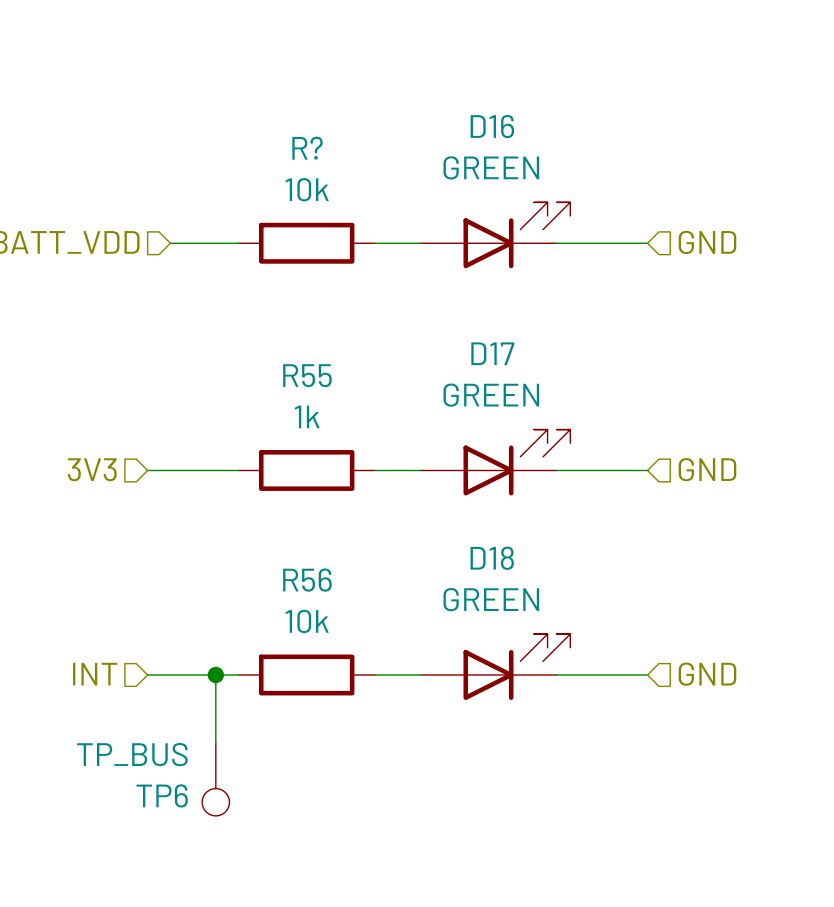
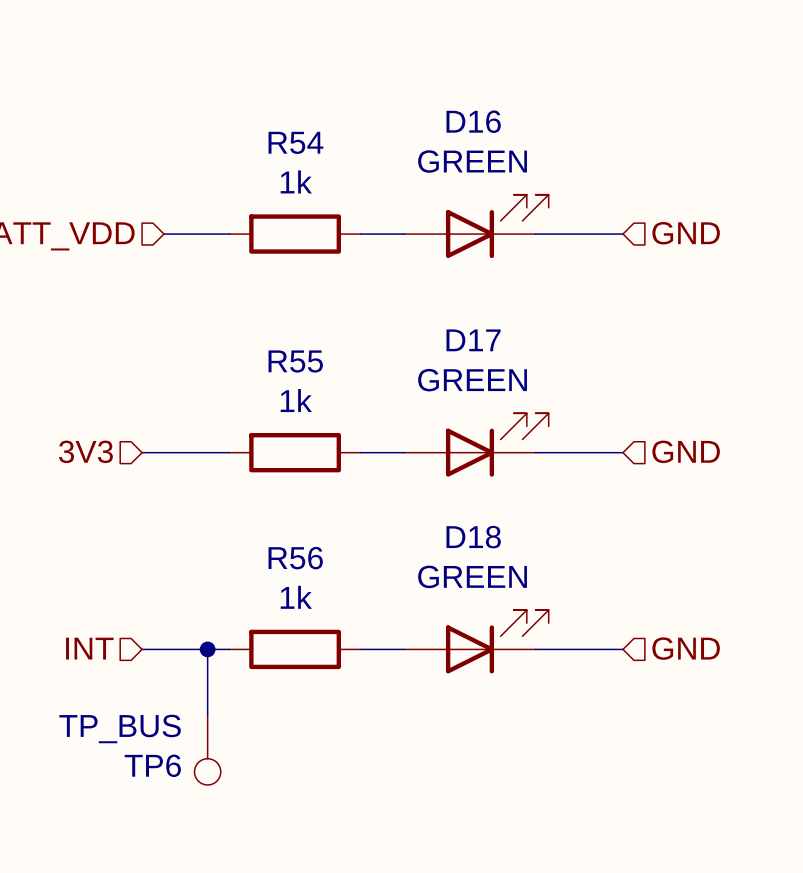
R? name: R? (307, 148) -> R54 (295, 142)
R? value: 10k (307, 189) -> 1k (296, 181)
R56 value: 10k (307, 621) -> 1k (296, 597)

